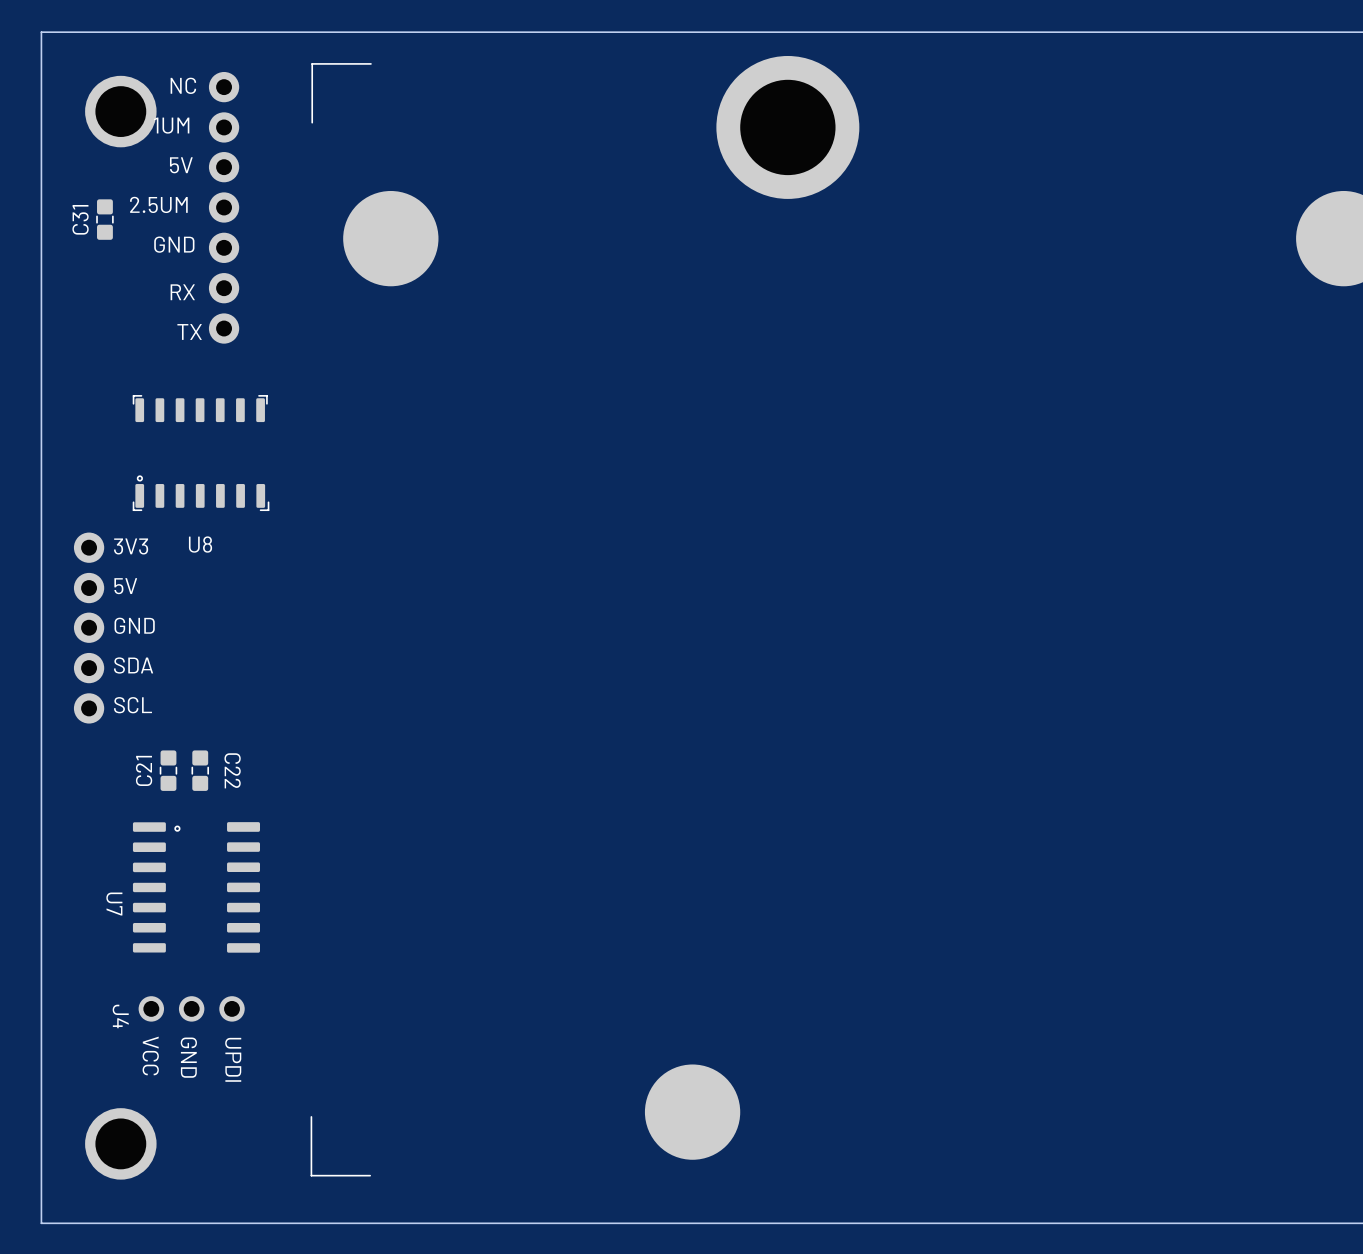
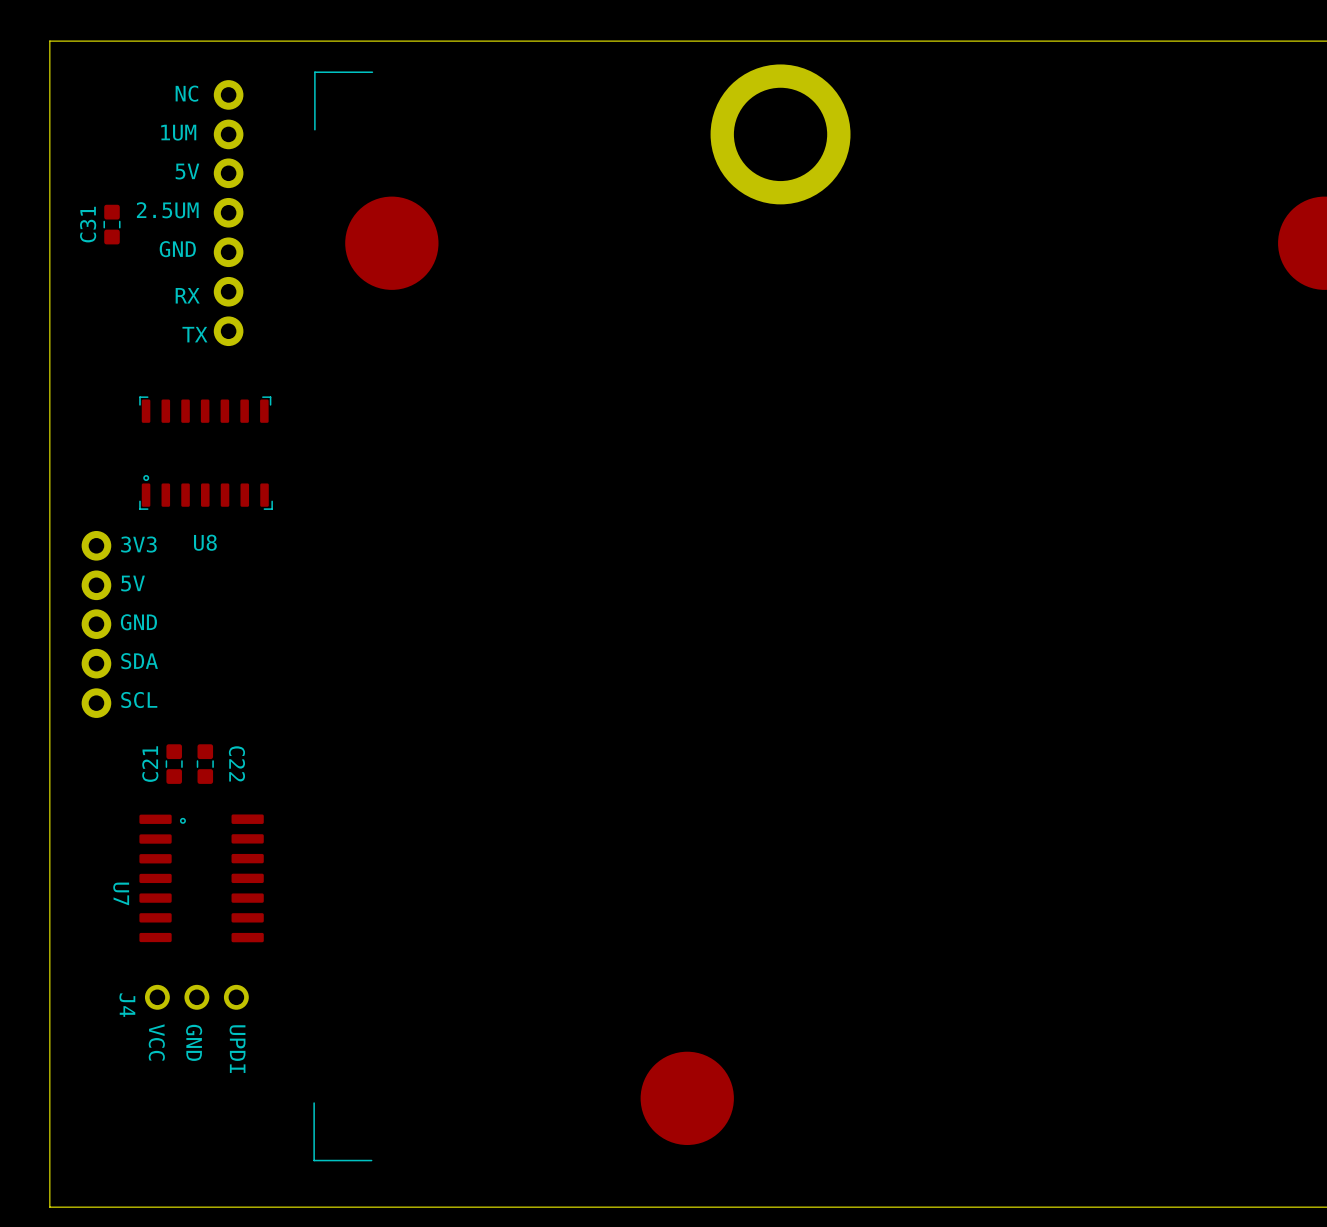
part: (120, 111) -> none
part: (120, 1143) -> none

